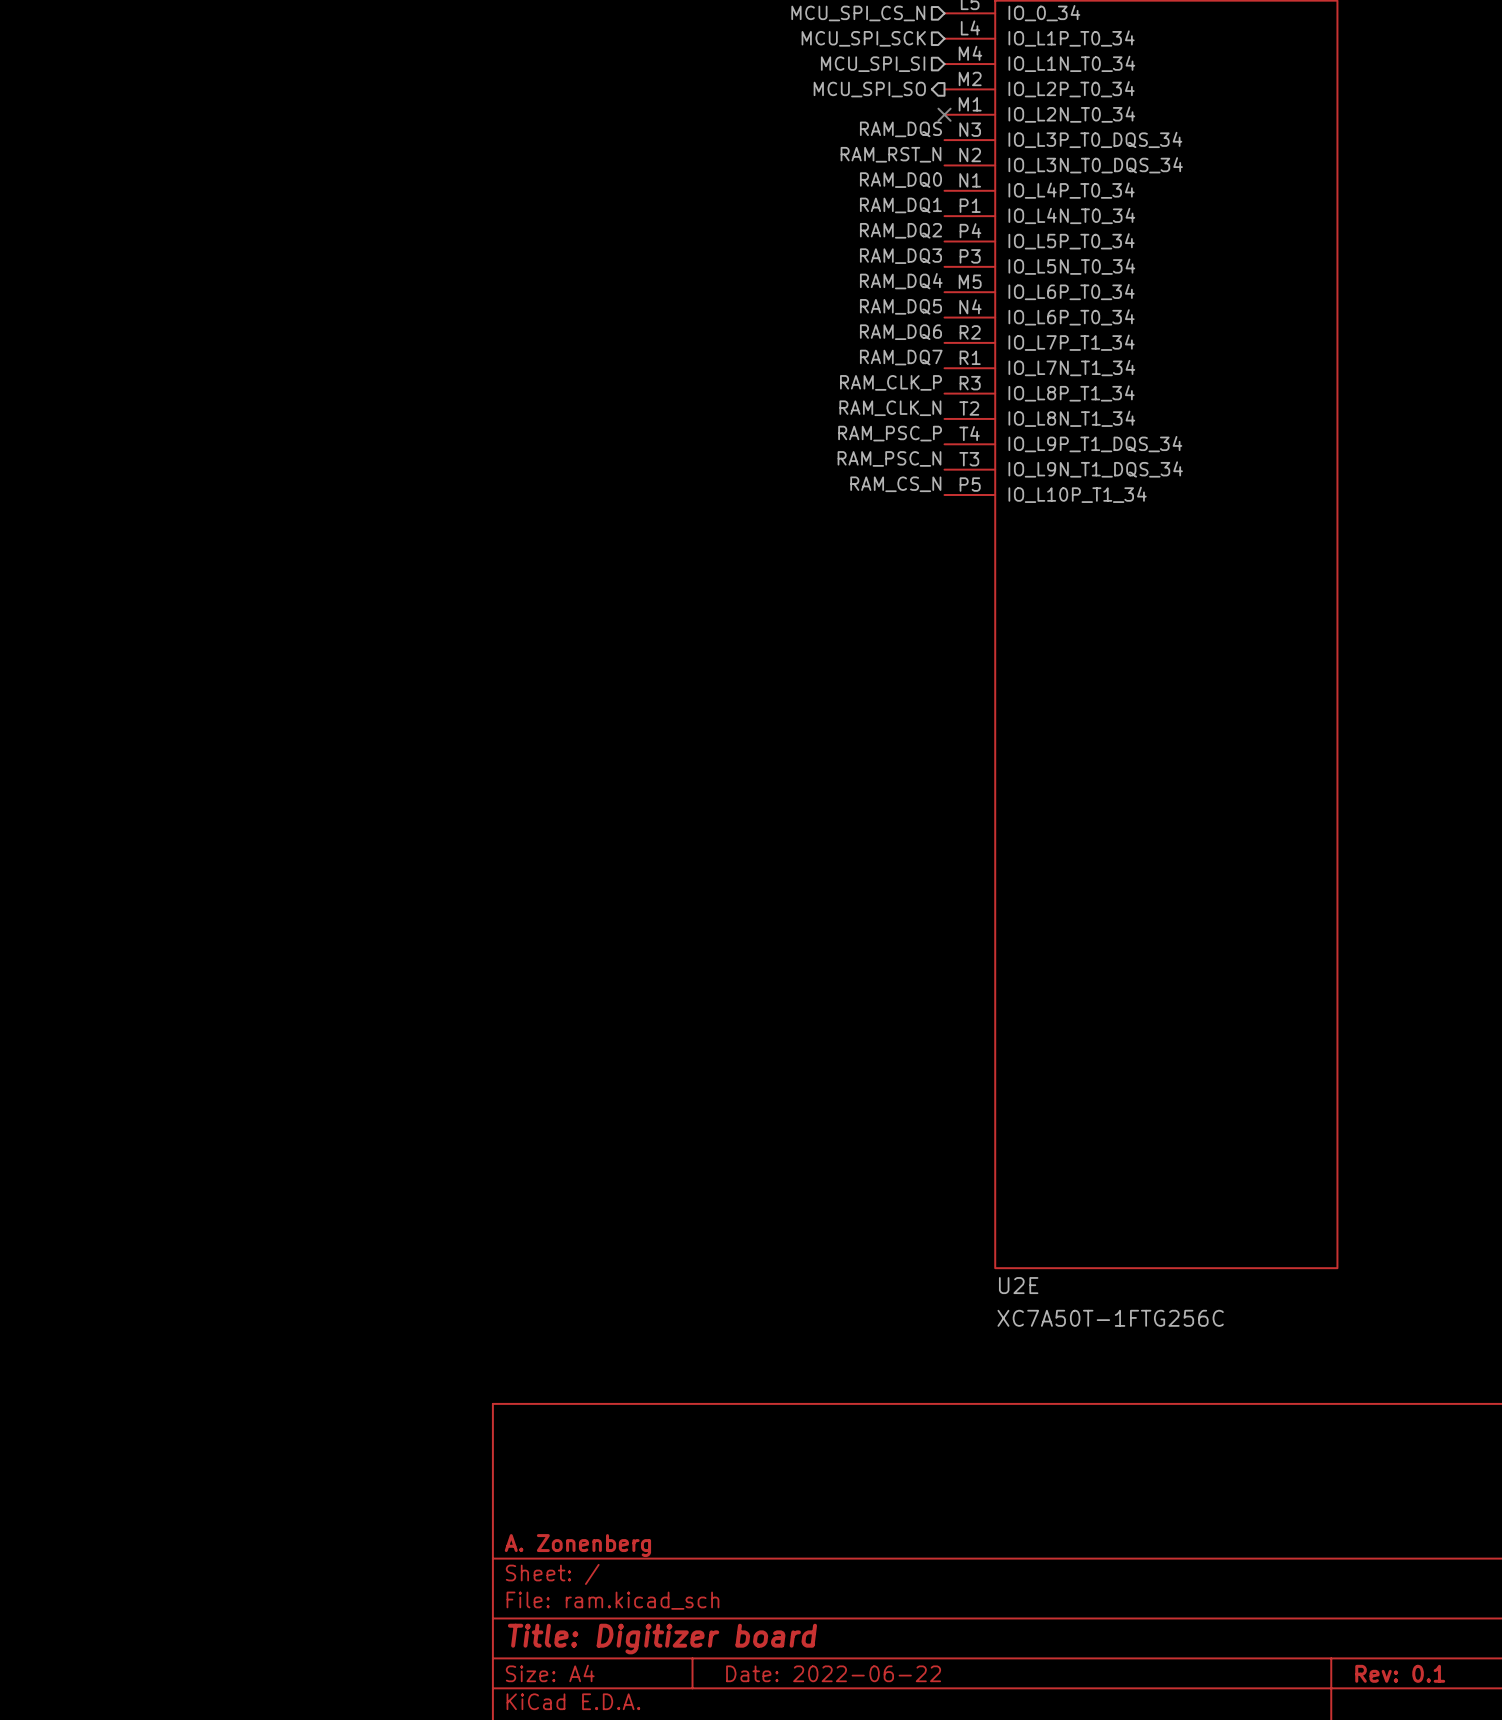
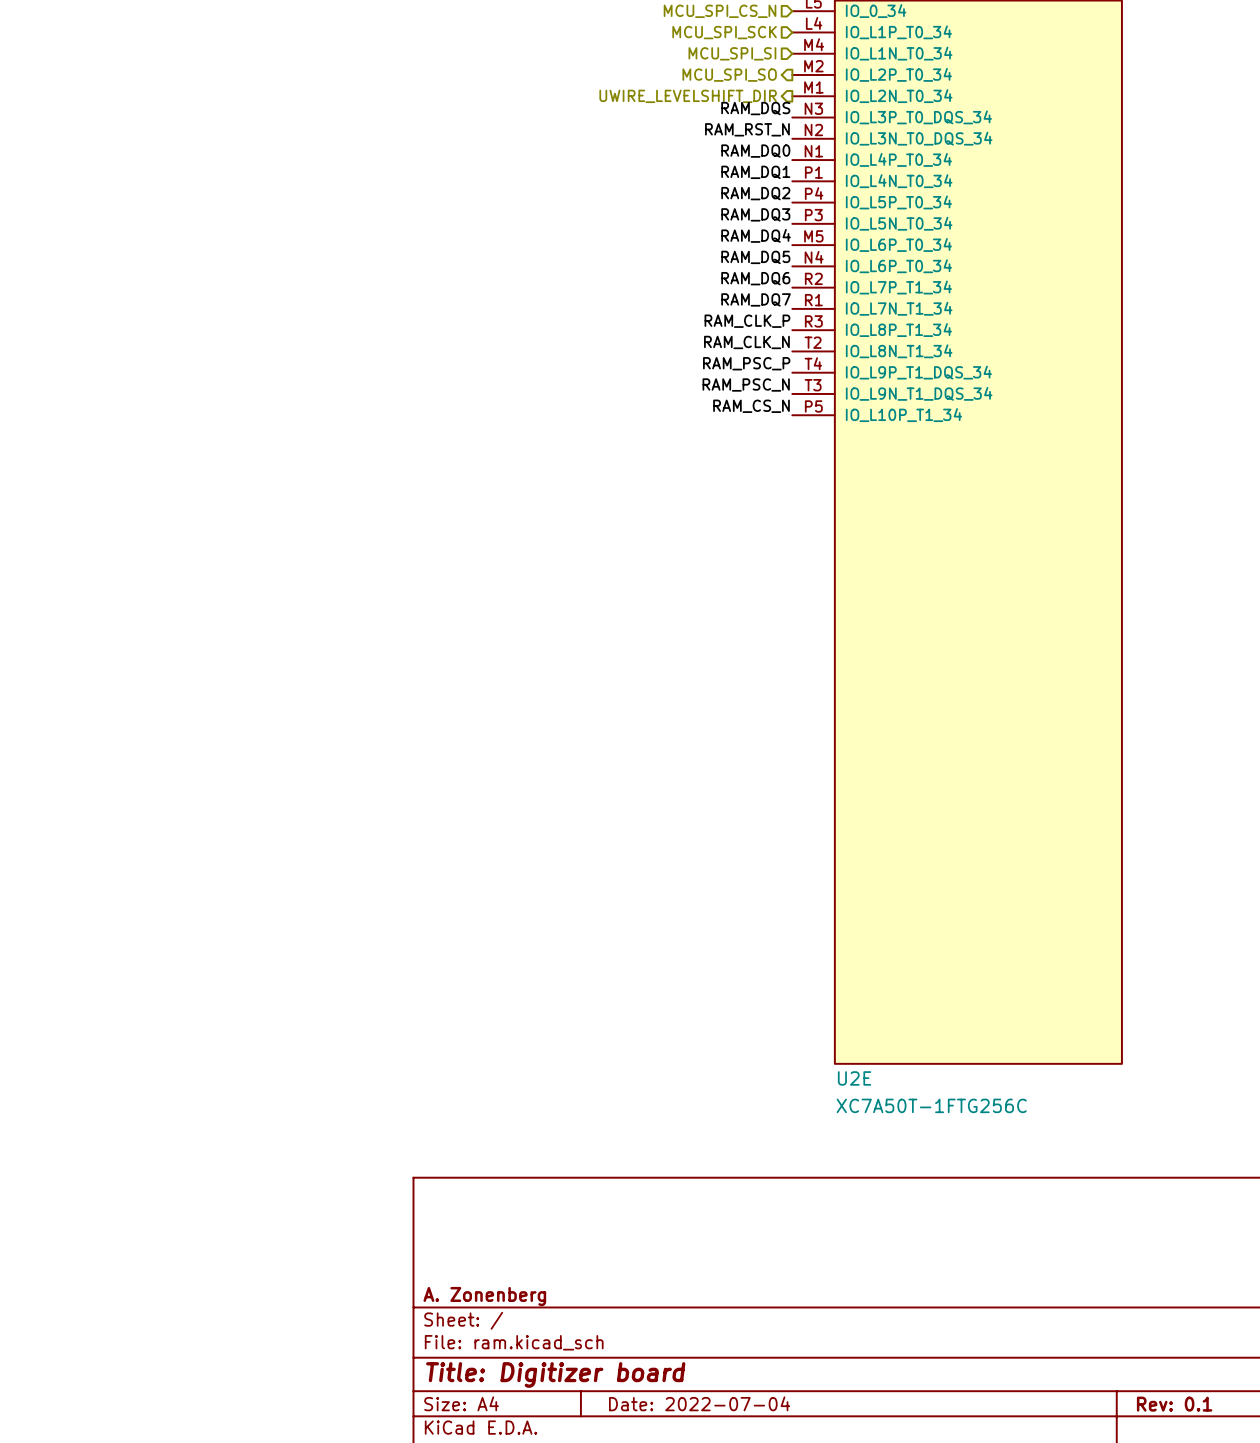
hierarchical label: none -> UWIRE_LEVELSHIFT_DIR (688, 96)
no-connect mark: (944, 114) -> none
title block: Date: 2022-06-22 (833, 1673) -> Date: 2022-07-04 (699, 1403)

